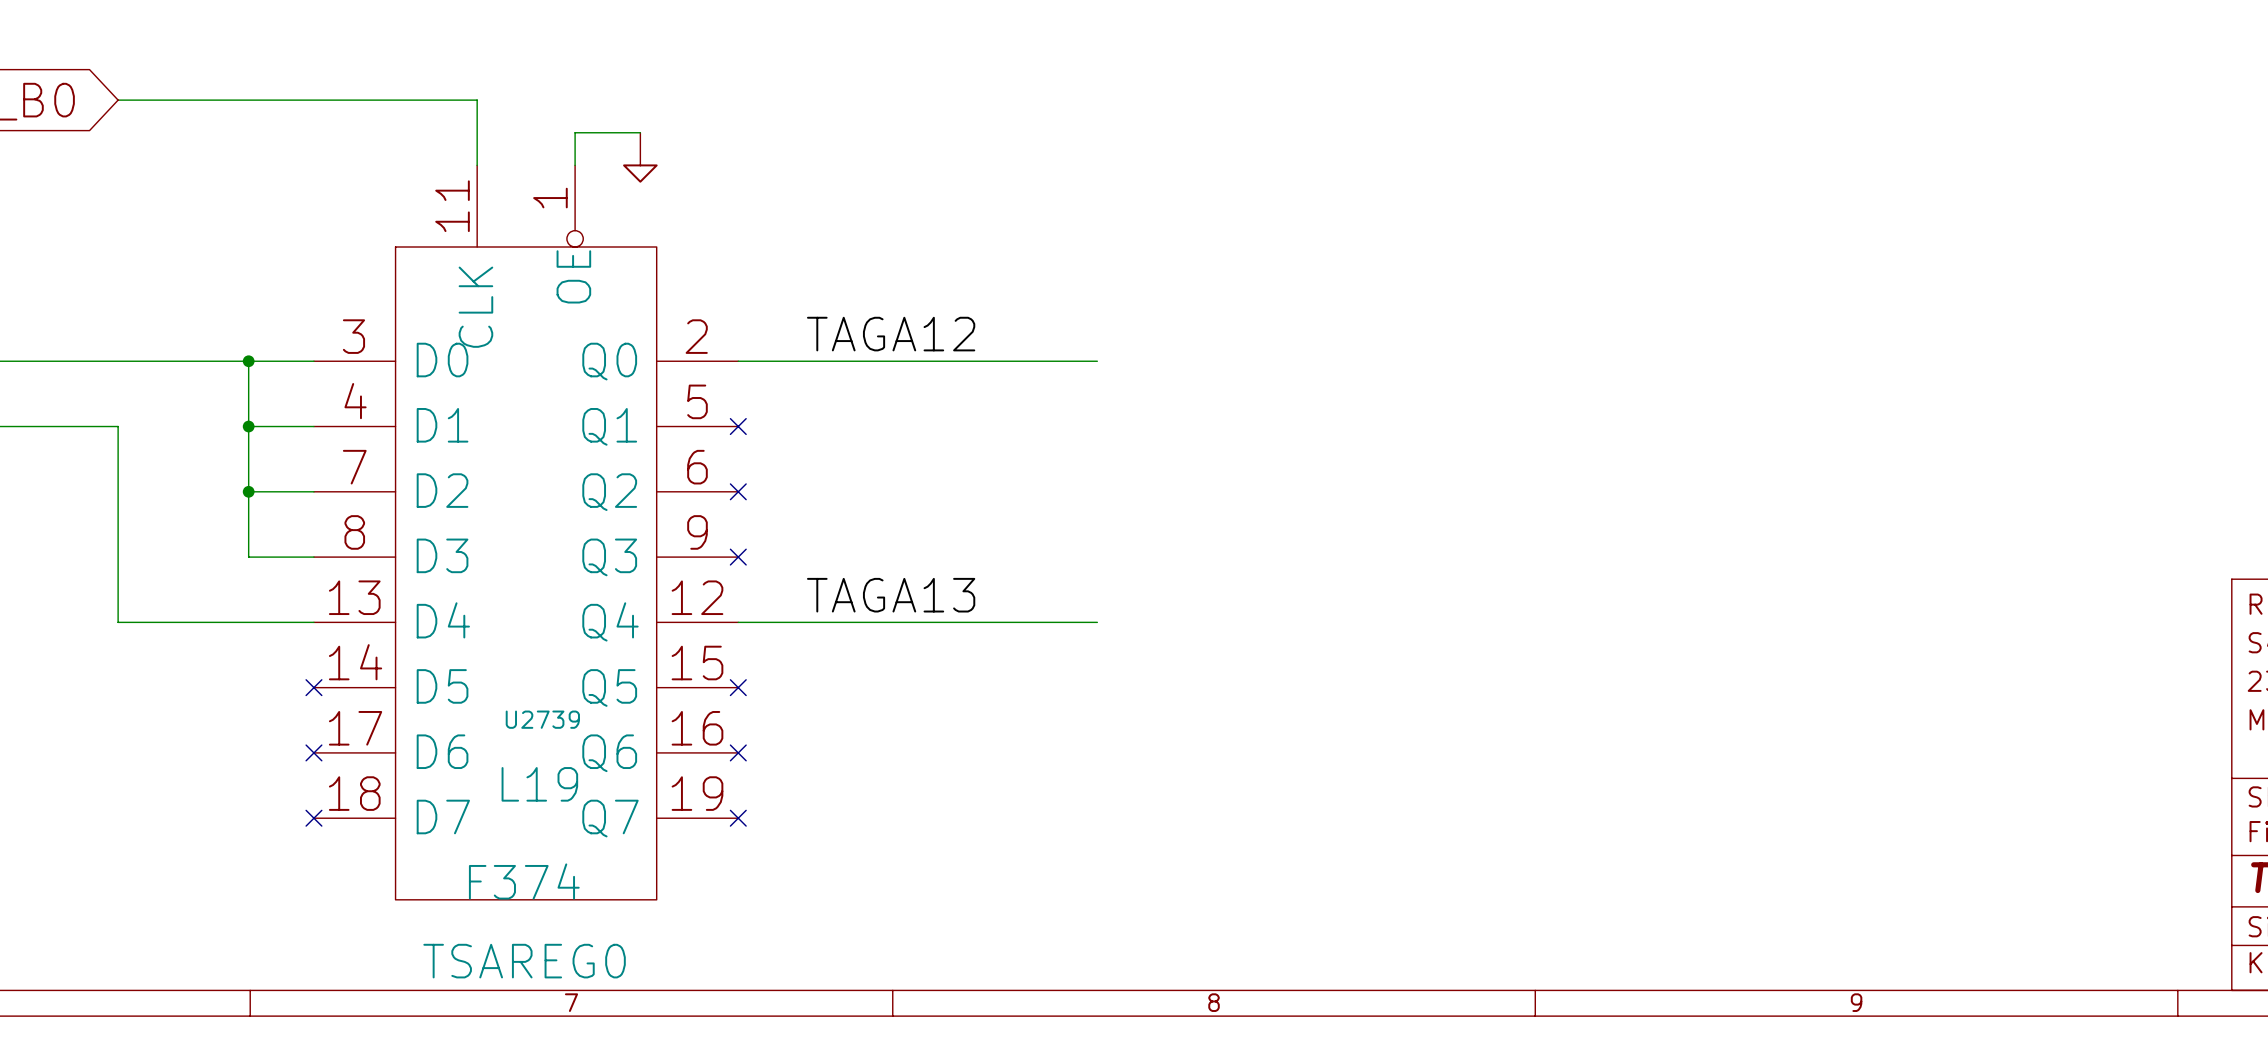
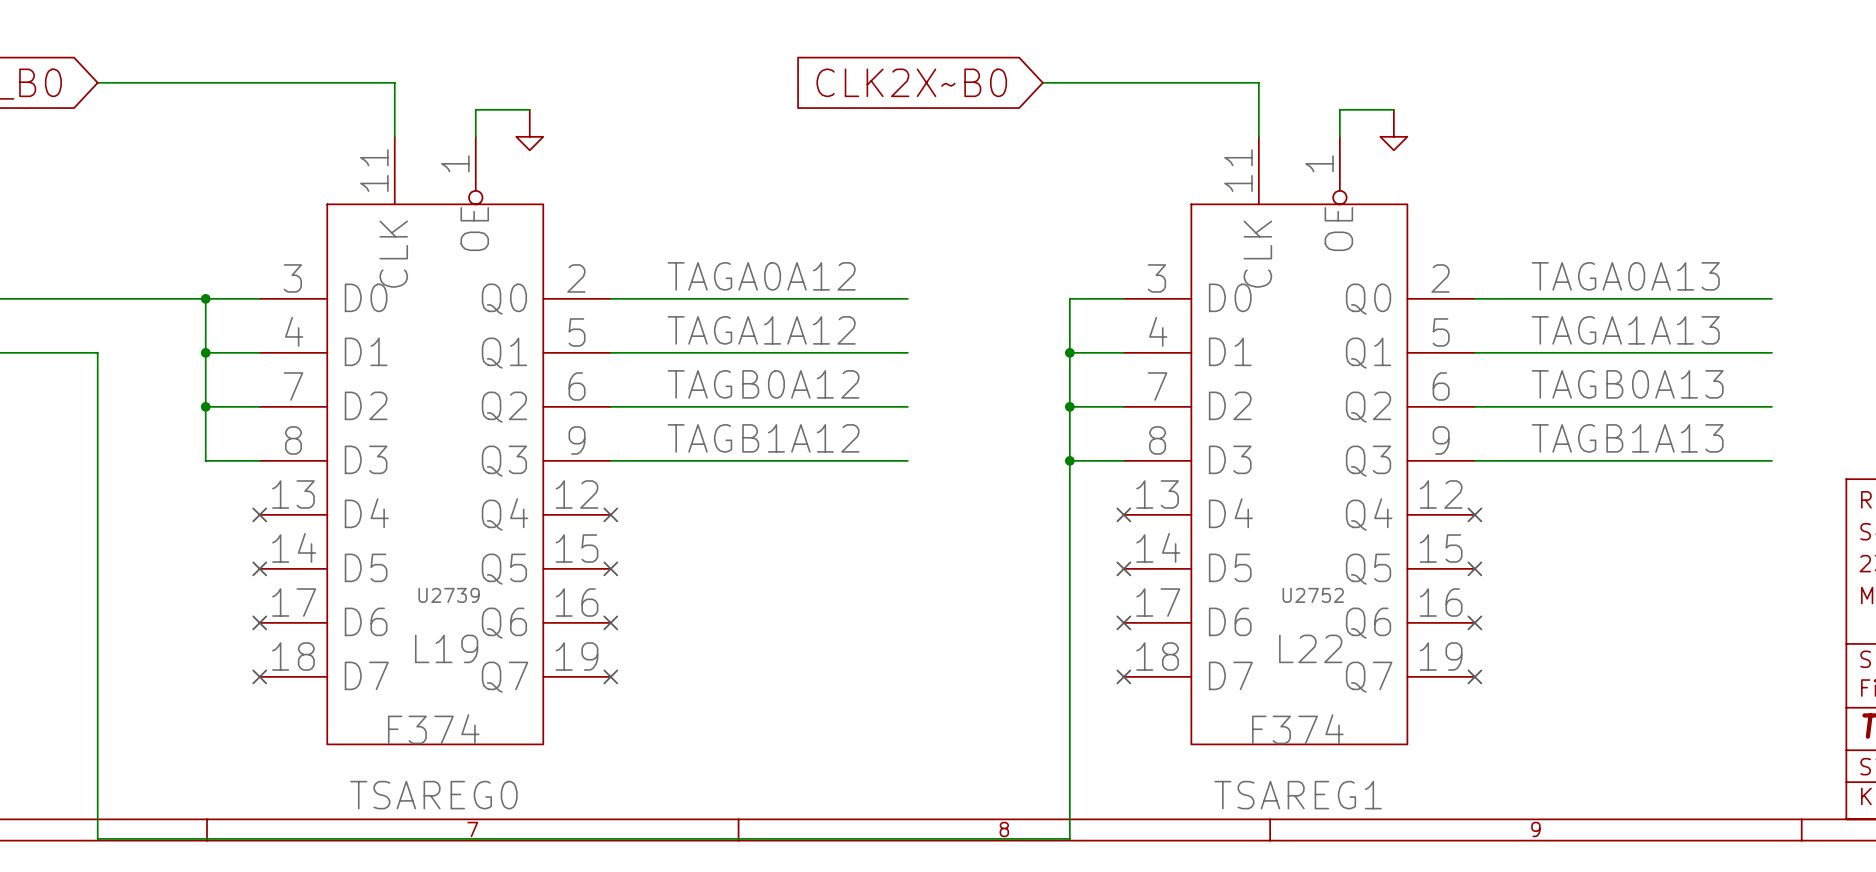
global label: none -> CLK2X~B0 (911, 82)
wire: none -> (1042, 82) (1258, 82) (1258, 136)
wire: none -> (1393, 109) (1339, 109) (1339, 136)
power symbol: none -> (1393, 130)
label: TAGA12 (891, 334) -> TAGA0A12 (761, 276)
label: none -> TAGA0A13 (1625, 276)
wire: none -> (1474, 298) (1771, 298)
label: none -> TAGA1A12 (761, 330)
label: none -> TAGA1A13 (1625, 330)
wire: none -> (610, 352) (907, 352)
no-connect mark: (738, 426) -> none
wire: none -> (1069, 352) (1123, 352)
junction: none -> (1069, 352)
wire: none -> (1474, 352) (1771, 352)
label: none -> TAGB0A12 (763, 384)
label: none -> TAGB0A13 (1627, 384)
wire: none -> (610, 406) (907, 406)
no-connect mark: (738, 491) -> none
wire: none -> (1069, 406) (1123, 406)
junction: none -> (1069, 406)
wire: none -> (1474, 406) (1771, 406)
label: none -> TAGB1A13 (1627, 438)
U2752: none -> F374 (1299, 440)
no-connect mark: (738, 557) -> none
wire: none -> (1069, 460) (1123, 460)
junction: none -> (1069, 460)
wire: none -> (1474, 460) (1771, 460)
label: TAGA13 (891, 595) -> TAGB1A12 (763, 438)
wire: (118, 622) (313, 622) -> (97, 514) (97, 838) (1069, 838) (1069, 298) (1123, 298)
no-connect mark: none -> (259, 514)
wire: (738, 622) (1097, 622) -> (610, 460) (907, 460)
no-connect mark: none -> (610, 514)
no-connect mark: none -> (1123, 514)
no-connect mark: none -> (1474, 514)
no-connect mark: none -> (1123, 568)
no-connect mark: none -> (1474, 568)
no-connect mark: none -> (1123, 622)
no-connect mark: none -> (1474, 622)
no-connect mark: none -> (1123, 676)
no-connect mark: none -> (1474, 676)

